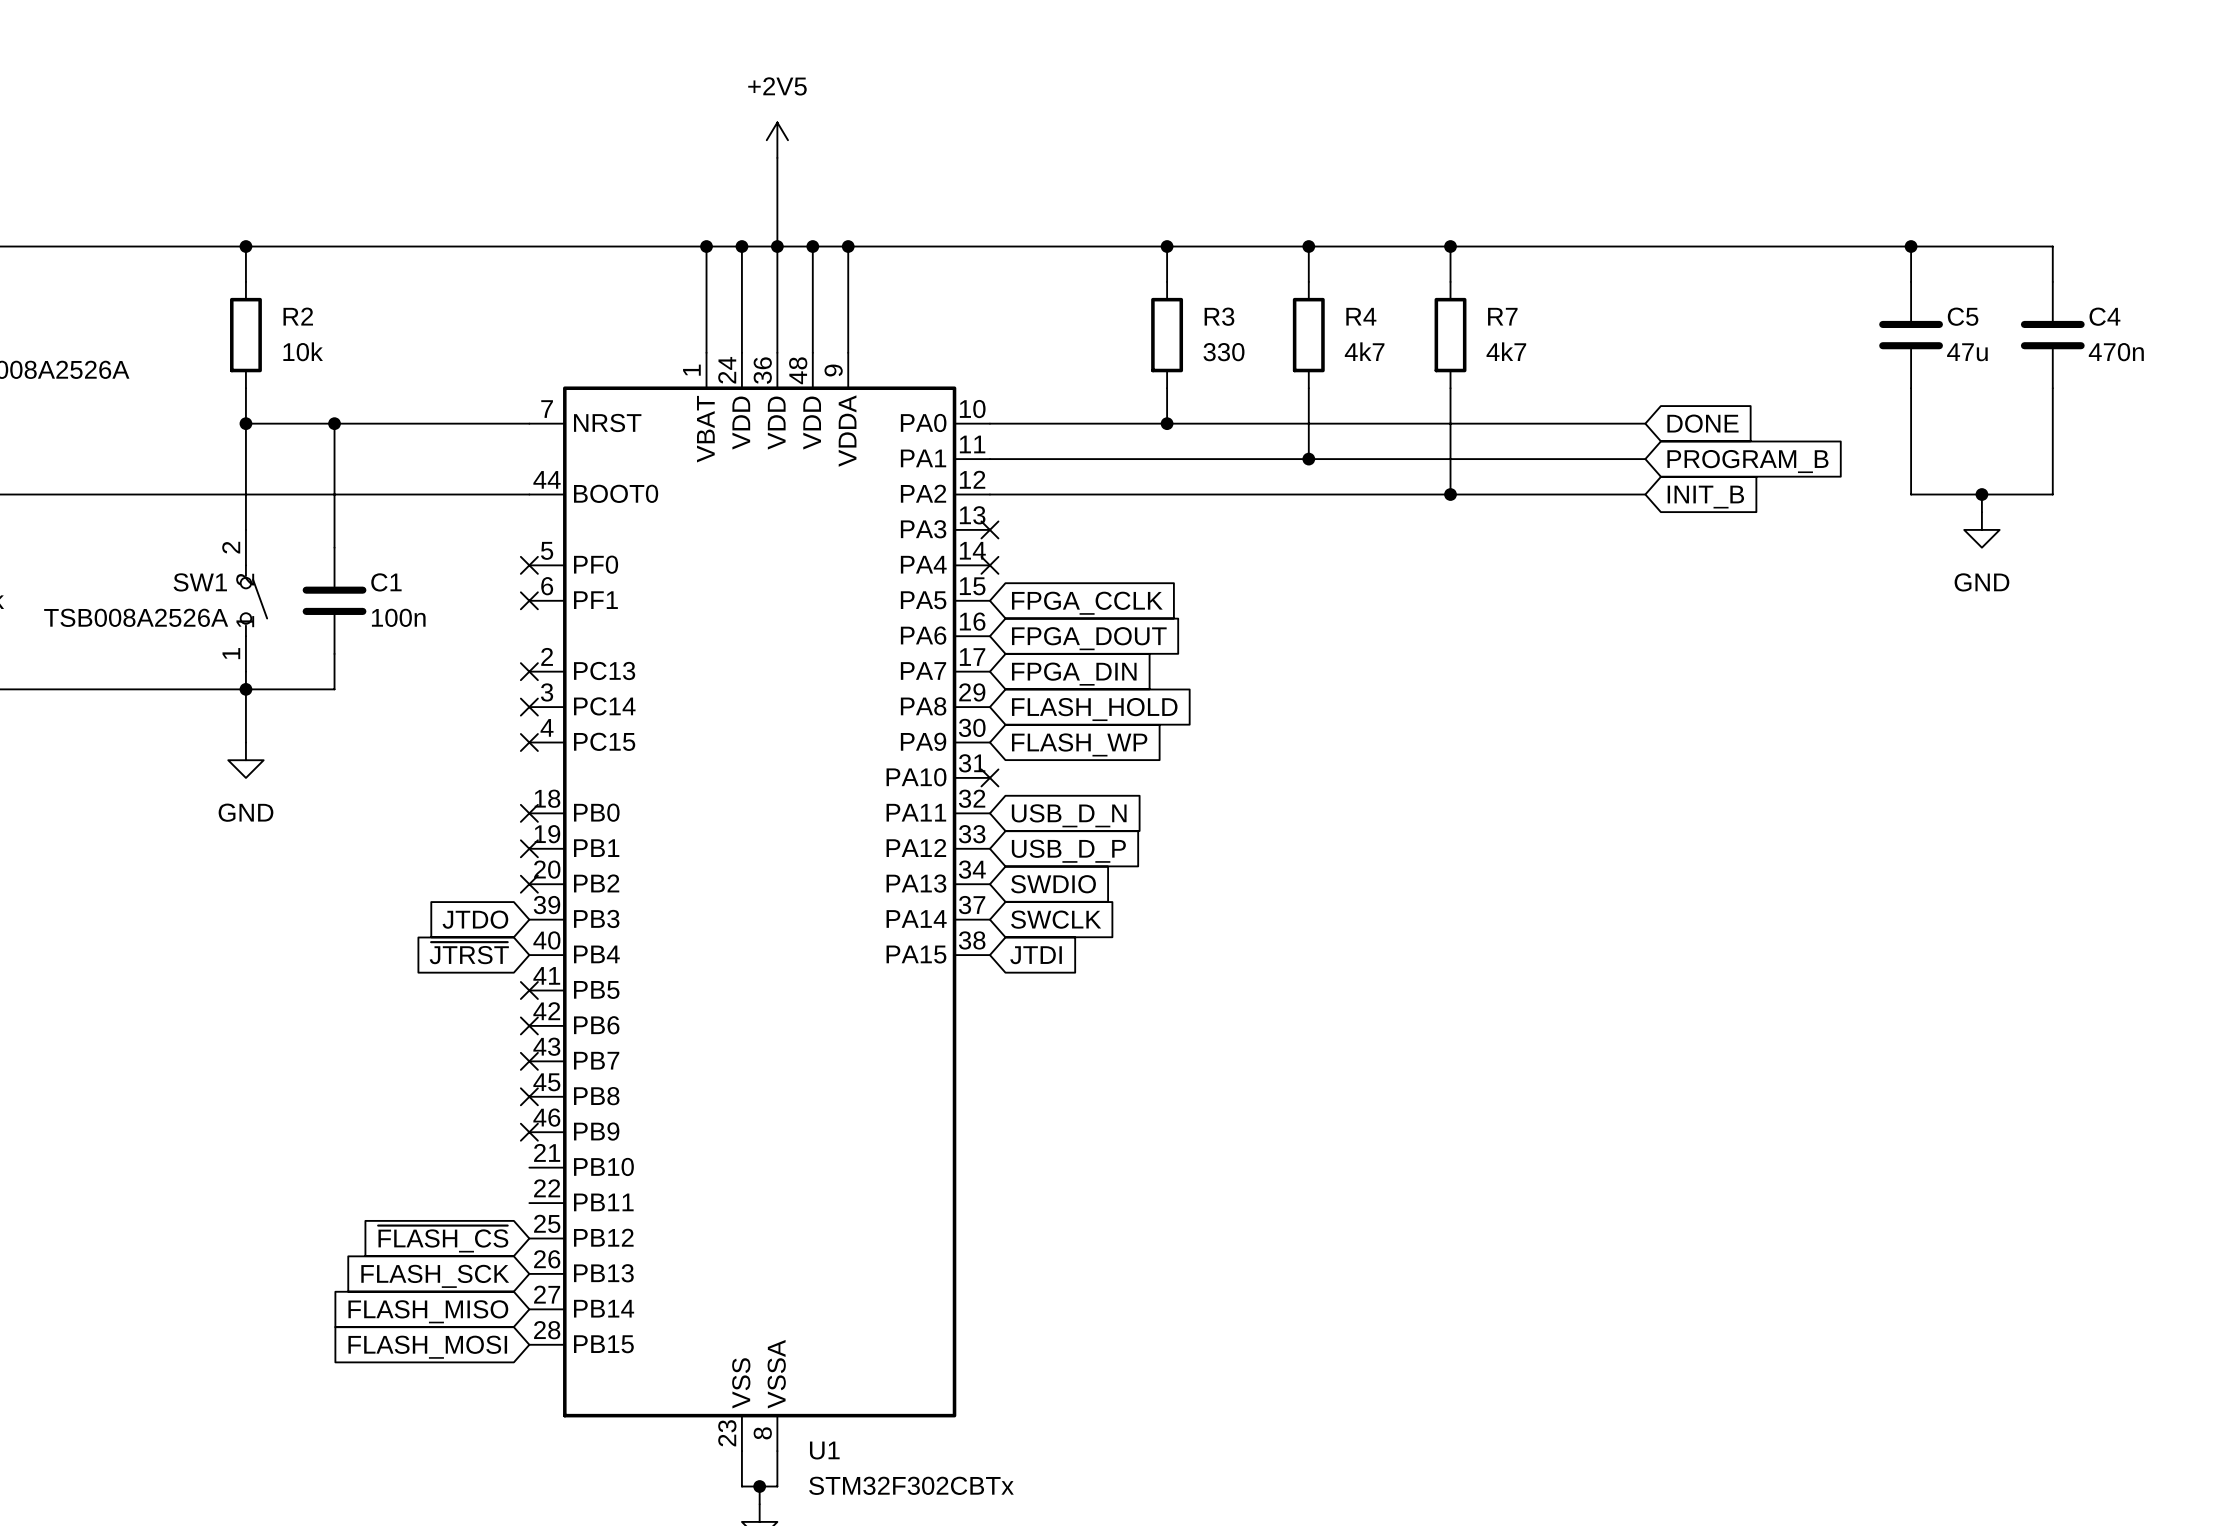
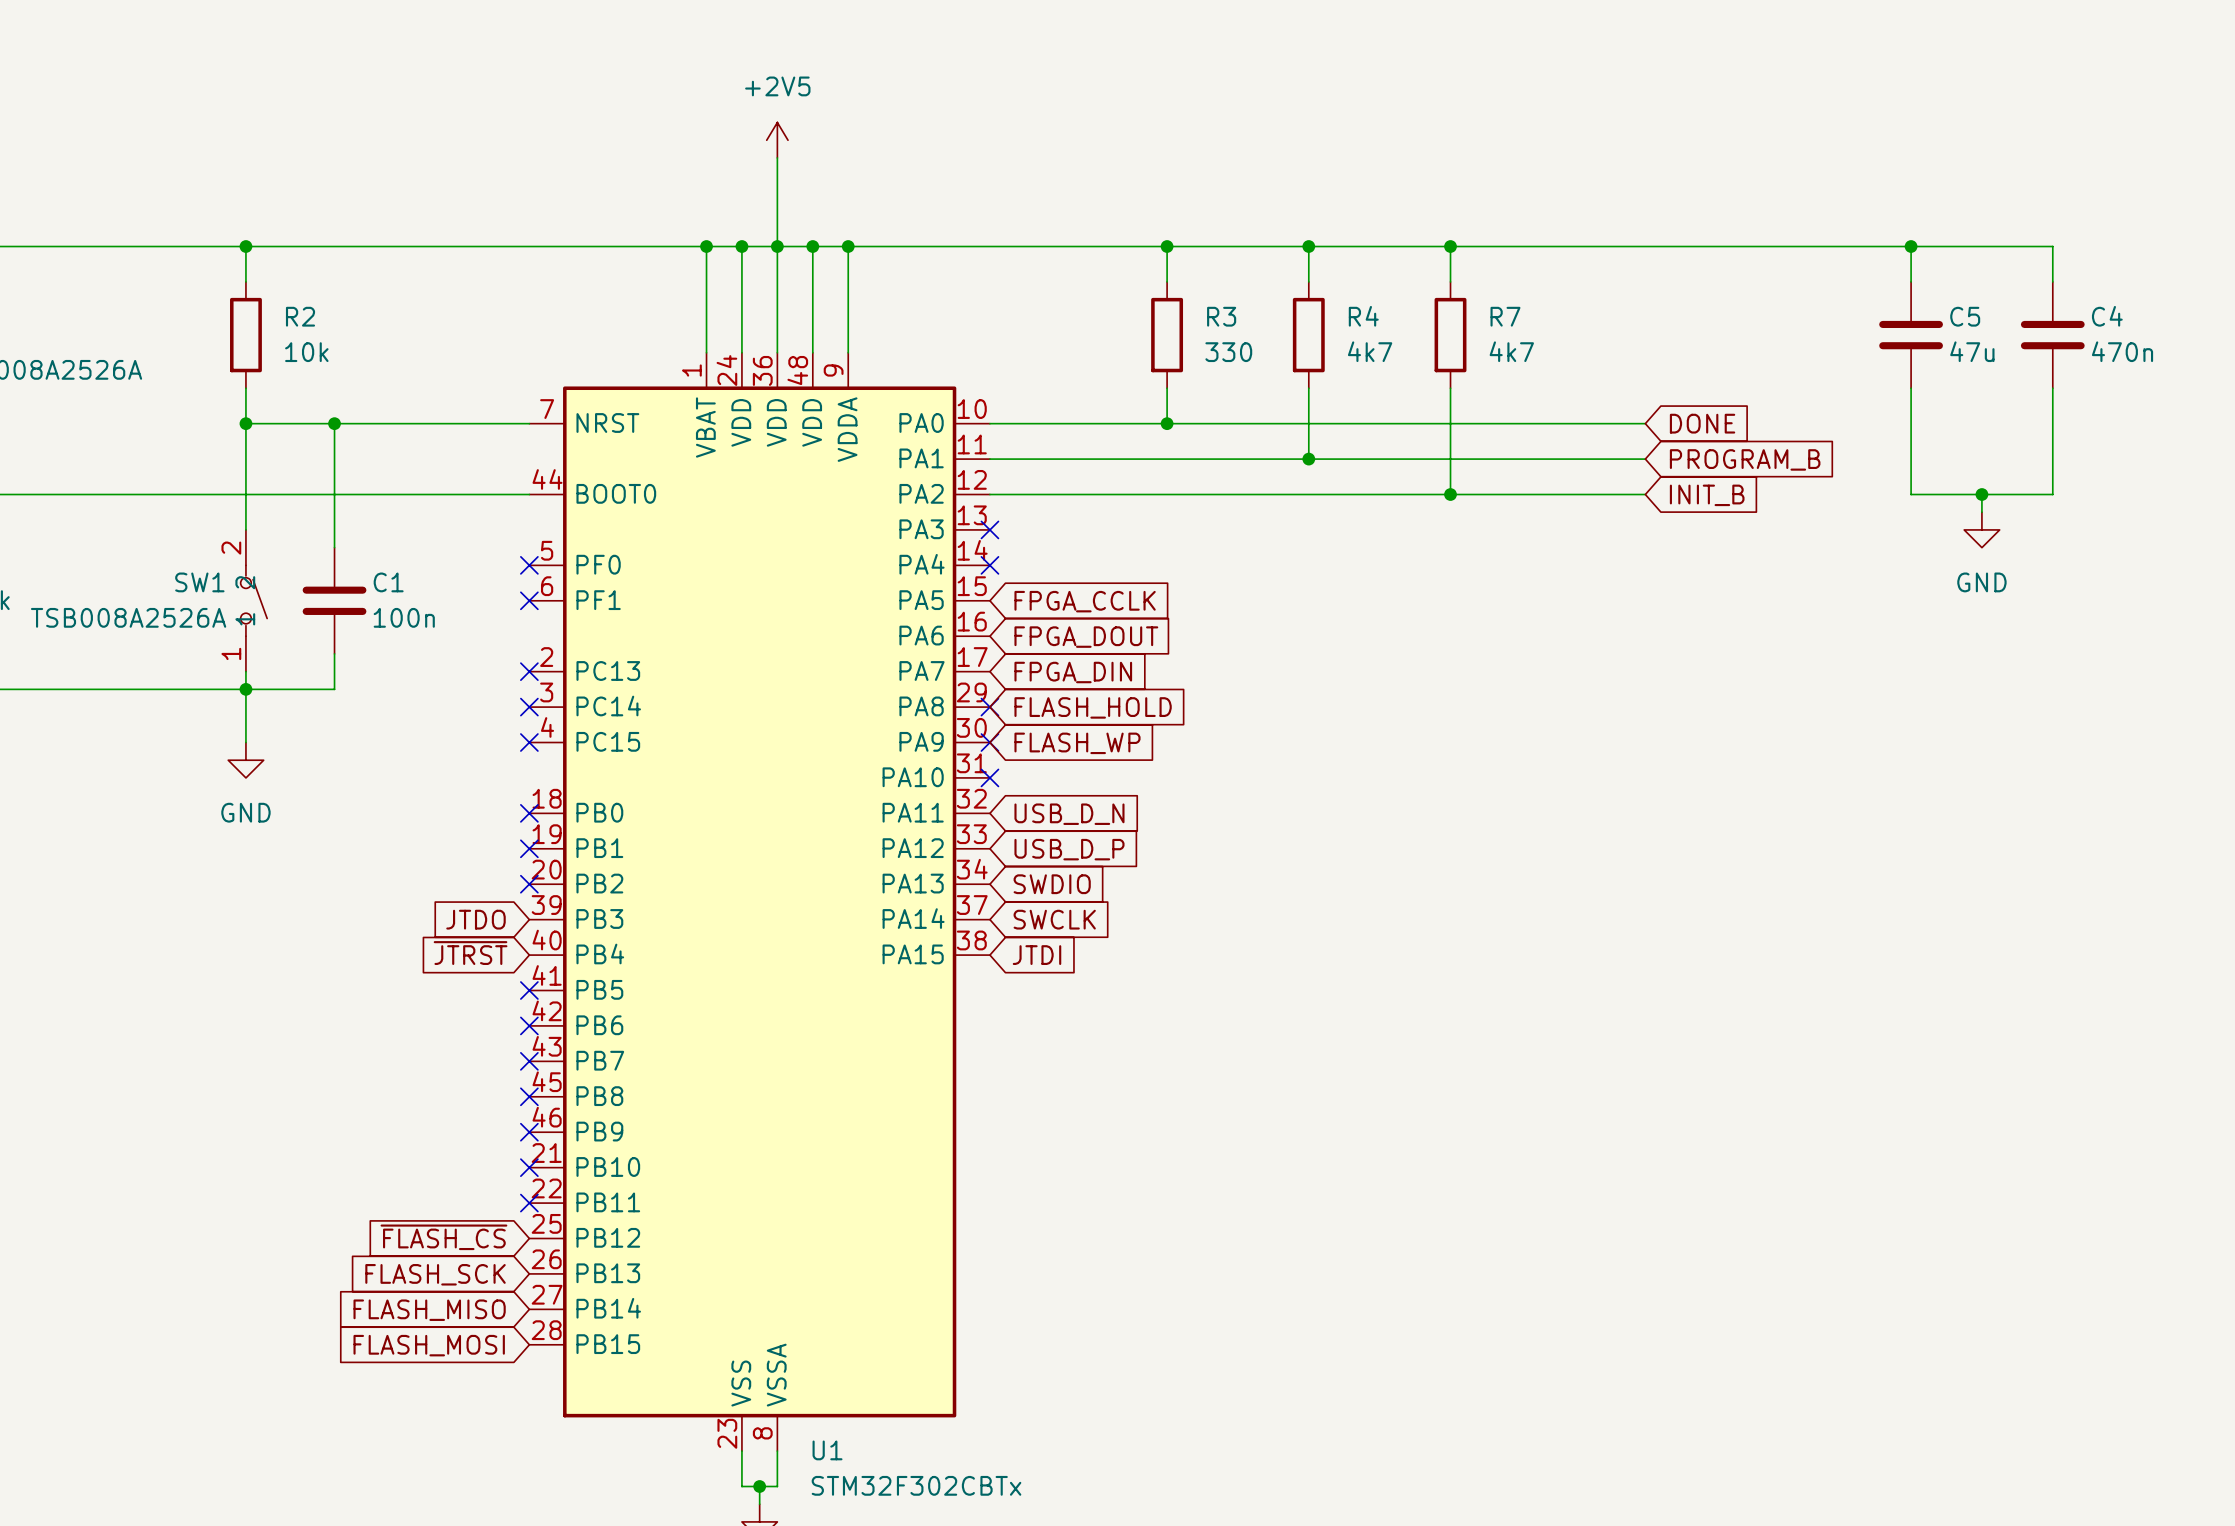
no-connect mark: none -> (989, 707)
no-connect mark: none -> (989, 742)
no-connect mark: none -> (529, 1167)
no-connect mark: none -> (529, 1203)

